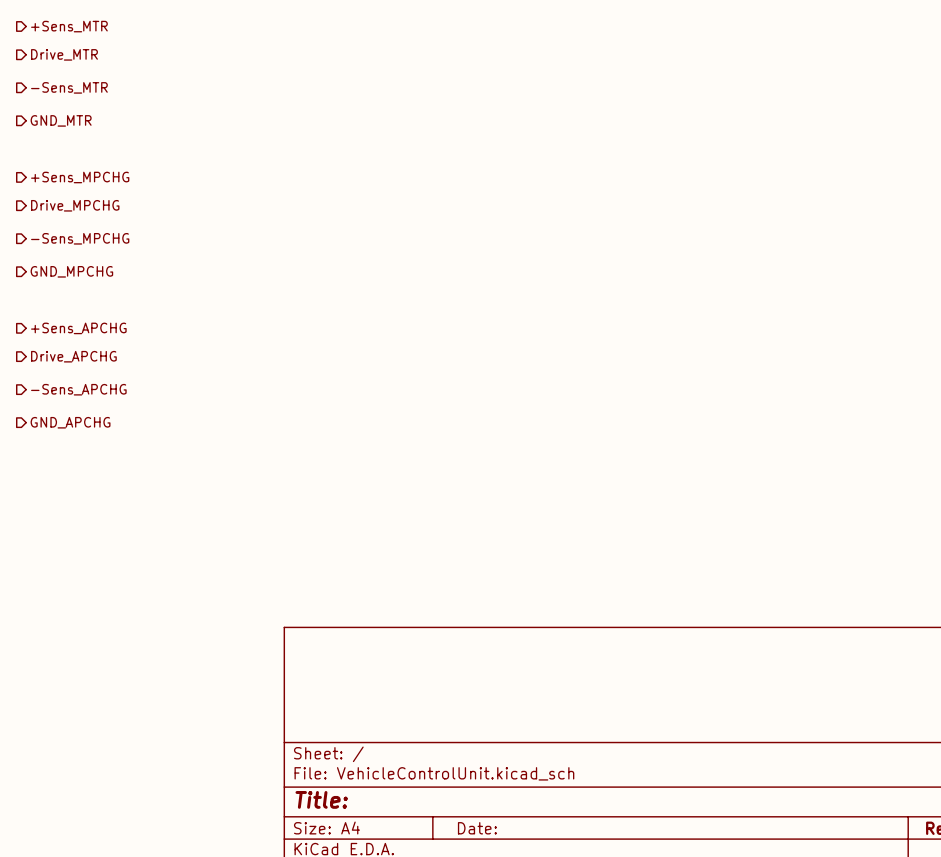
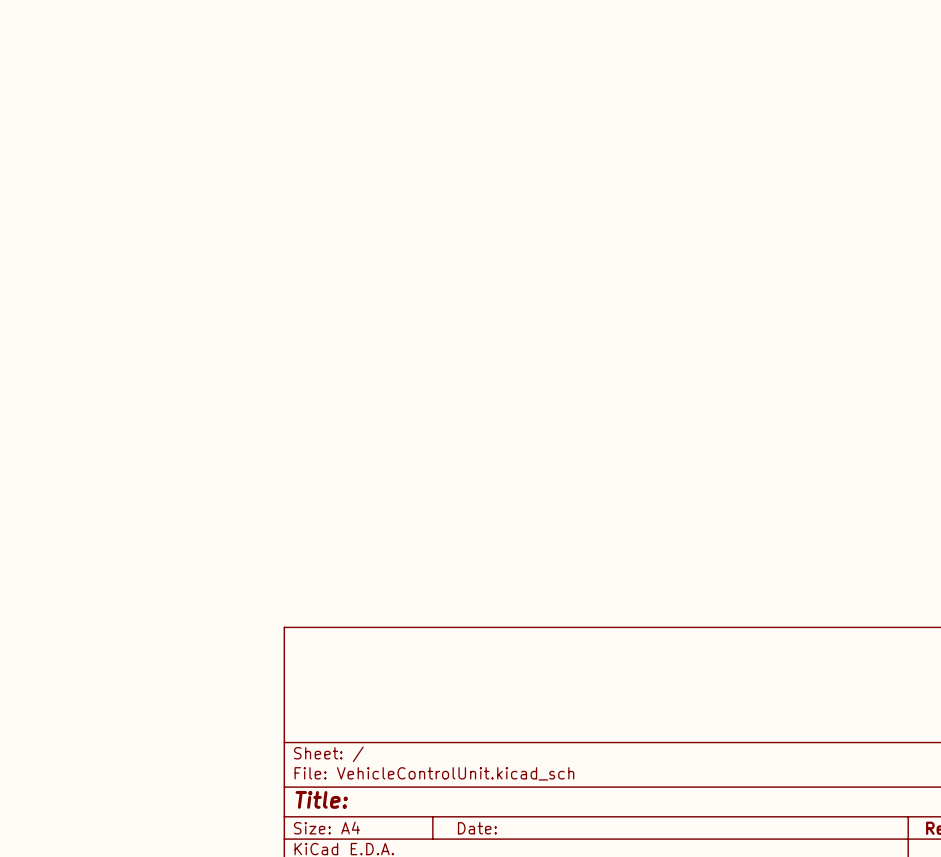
hierarchical label: +Sens_MTR (69, 26) -> none
hierarchical label: Drive_MTR (64, 54) -> none
hierarchical label: -Sens_MTR (69, 87) -> none
hierarchical label: GND_MTR (61, 120) -> none
hierarchical label: +Sens_MPCHG (80, 177) -> none
hierarchical label: Drive_MPCHG (75, 205) -> none
hierarchical label: -Sens_MPCHG (80, 238) -> none
hierarchical label: GND_MPCHG (71, 271) -> none
hierarchical label: +Sens_APCHG (78, 328) -> none
hierarchical label: Drive_APCHG (73, 356) -> none
hierarchical label: -Sens_APCHG (78, 389) -> none
hierarchical label: GND_APCHG (70, 422) -> none

